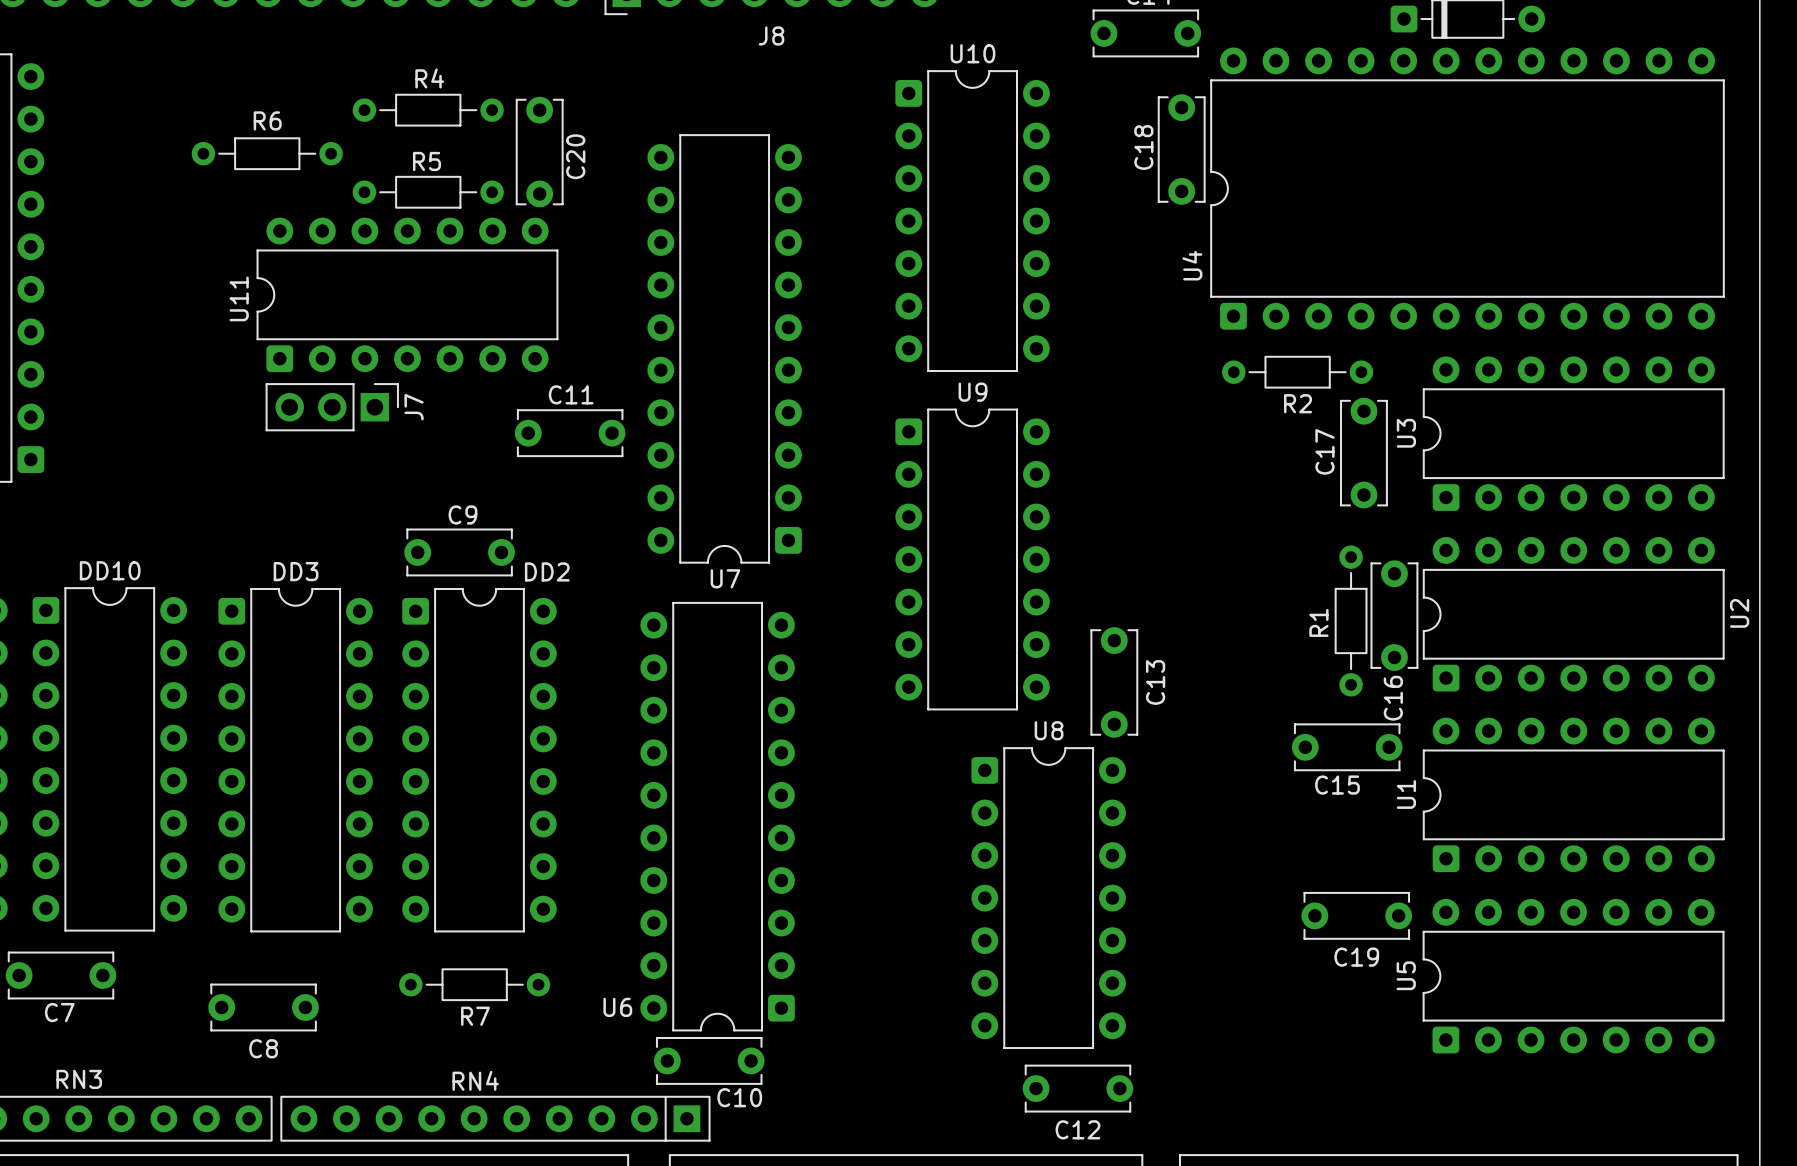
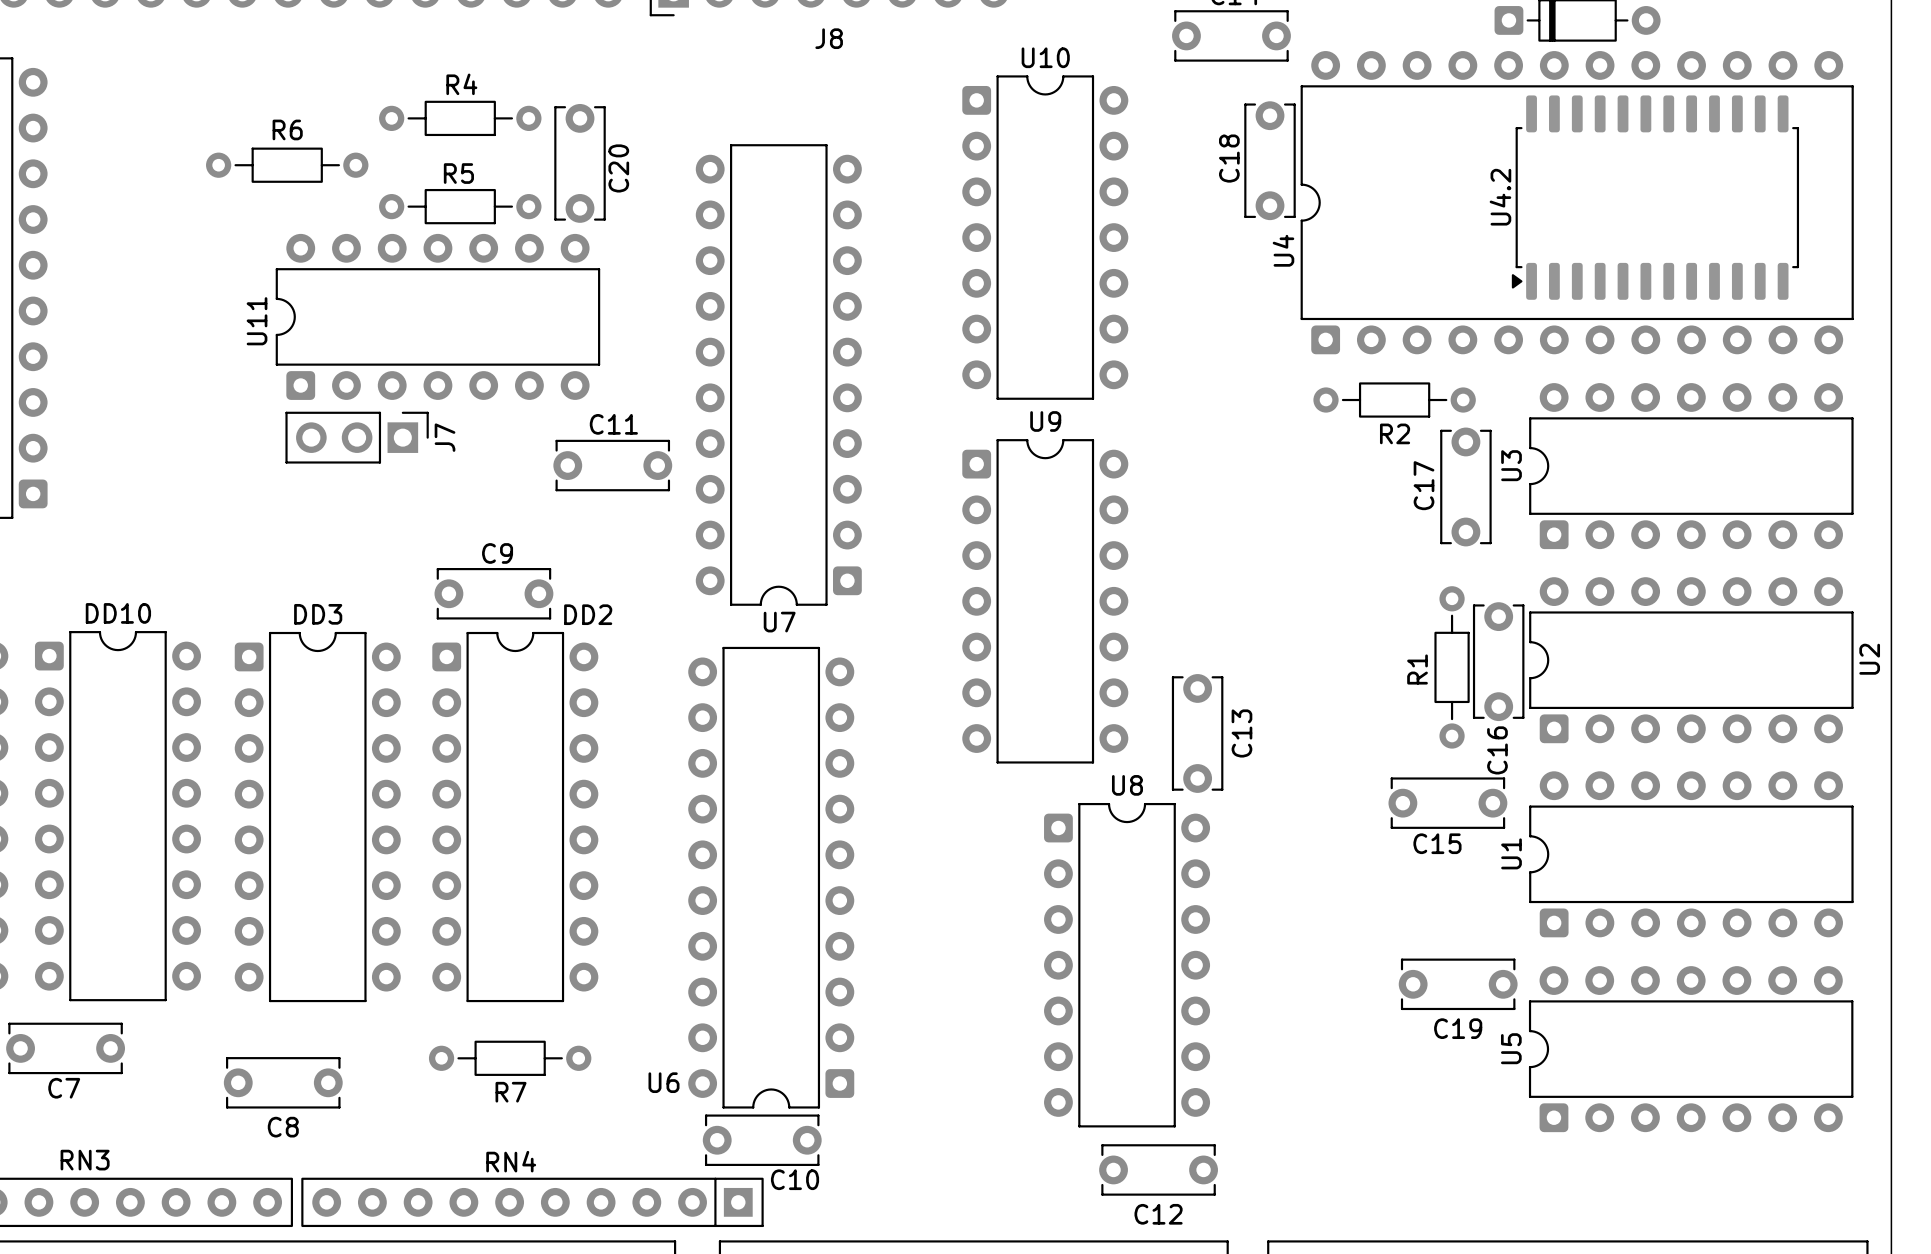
U4.2: none -> (1655, 197)
U4 name position: U4 (1192, 265) -> U4 (1283, 250)

